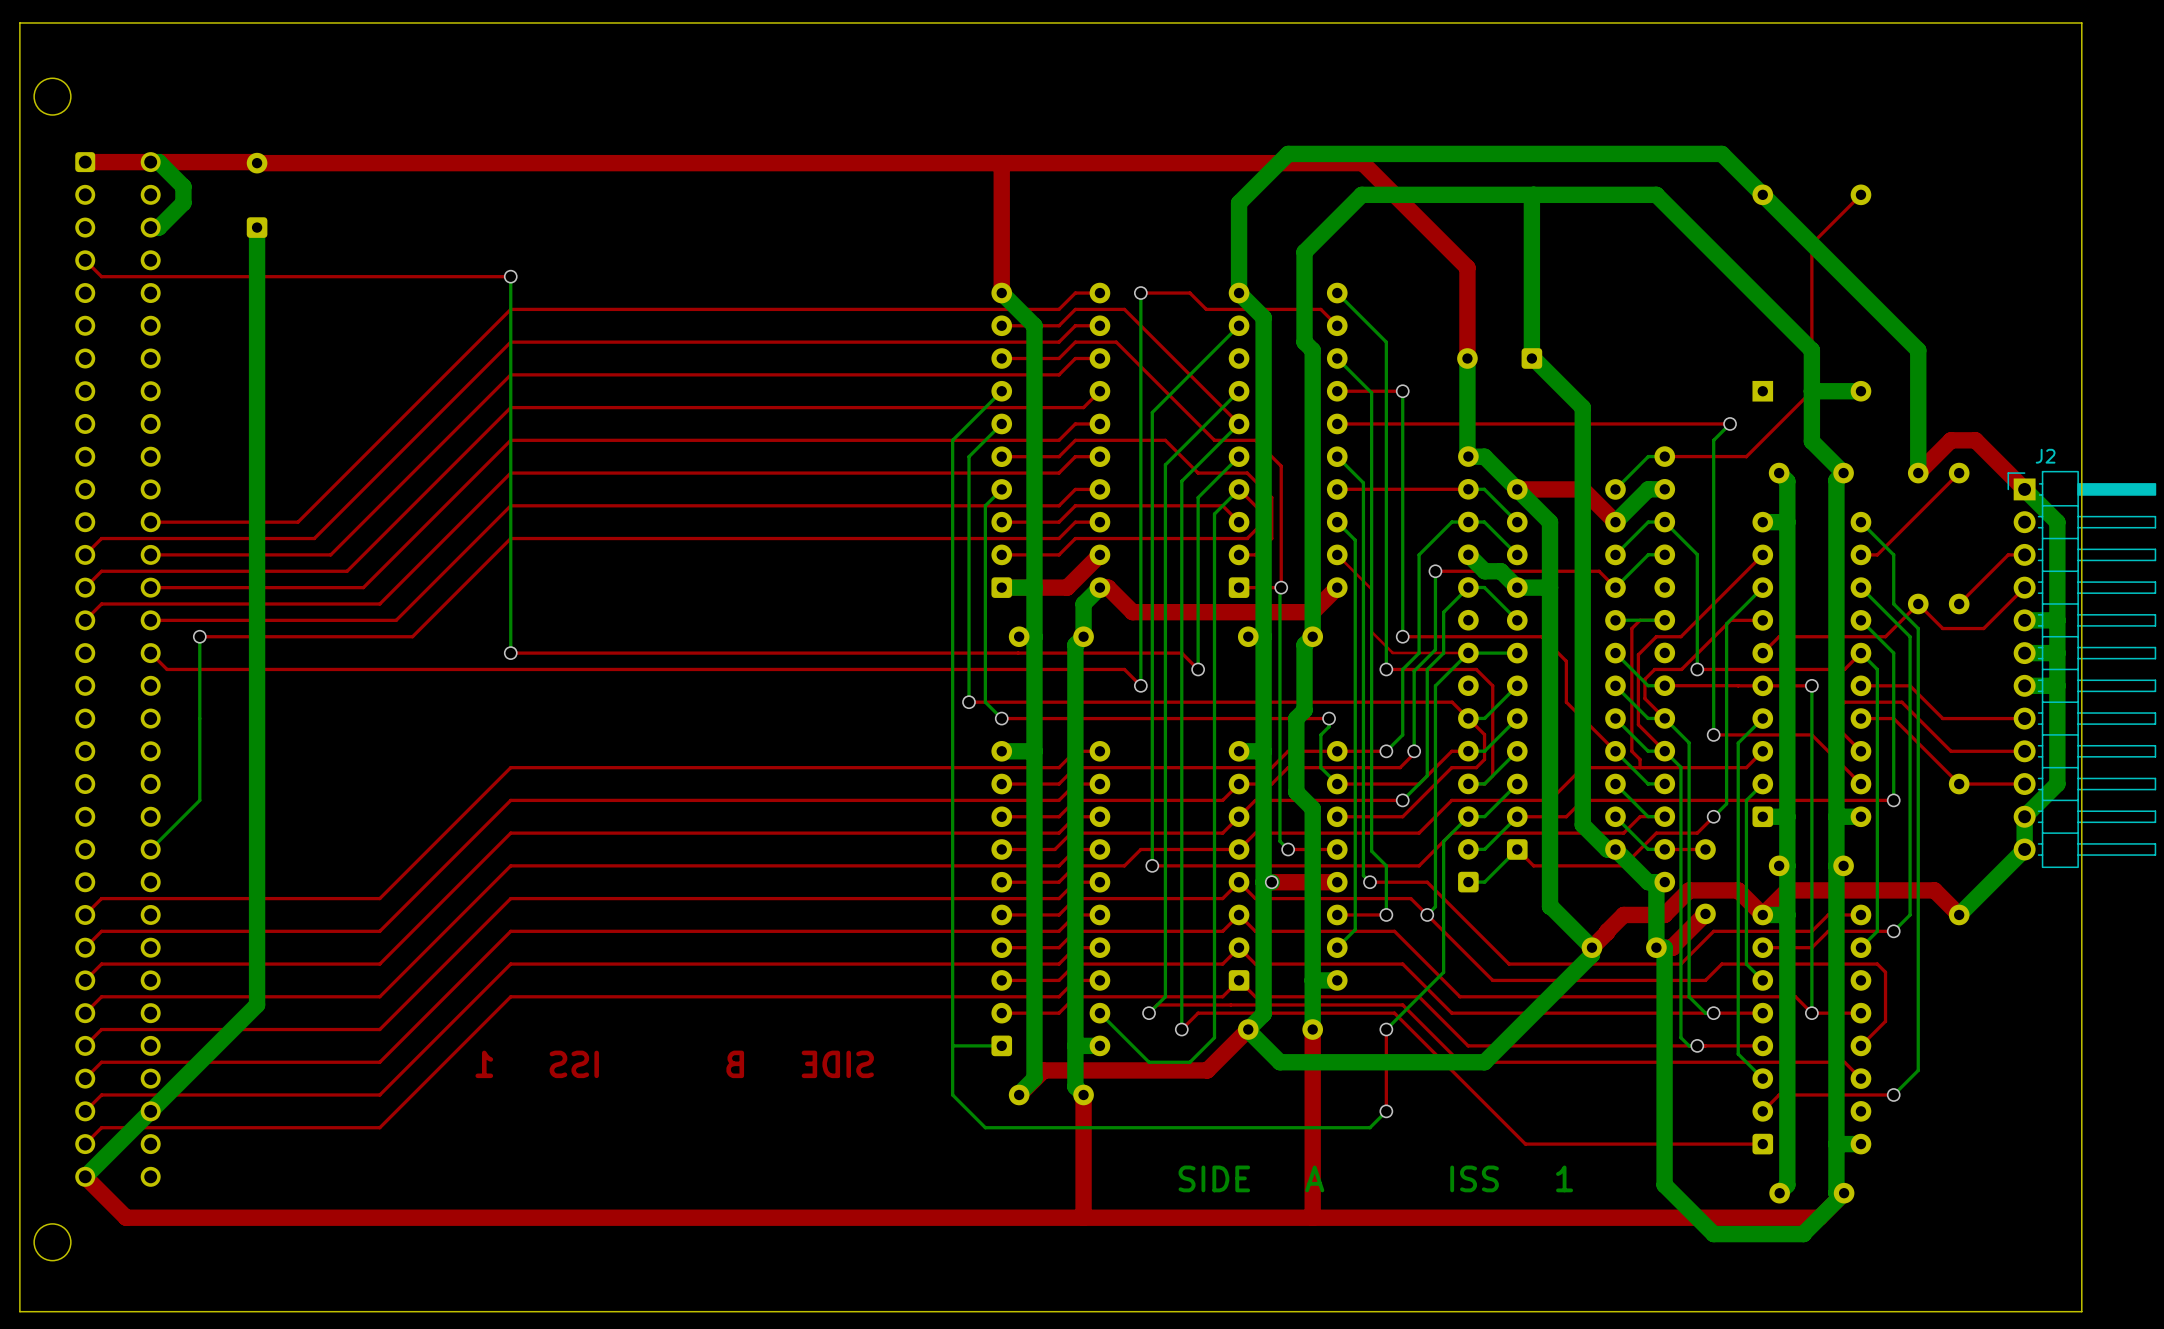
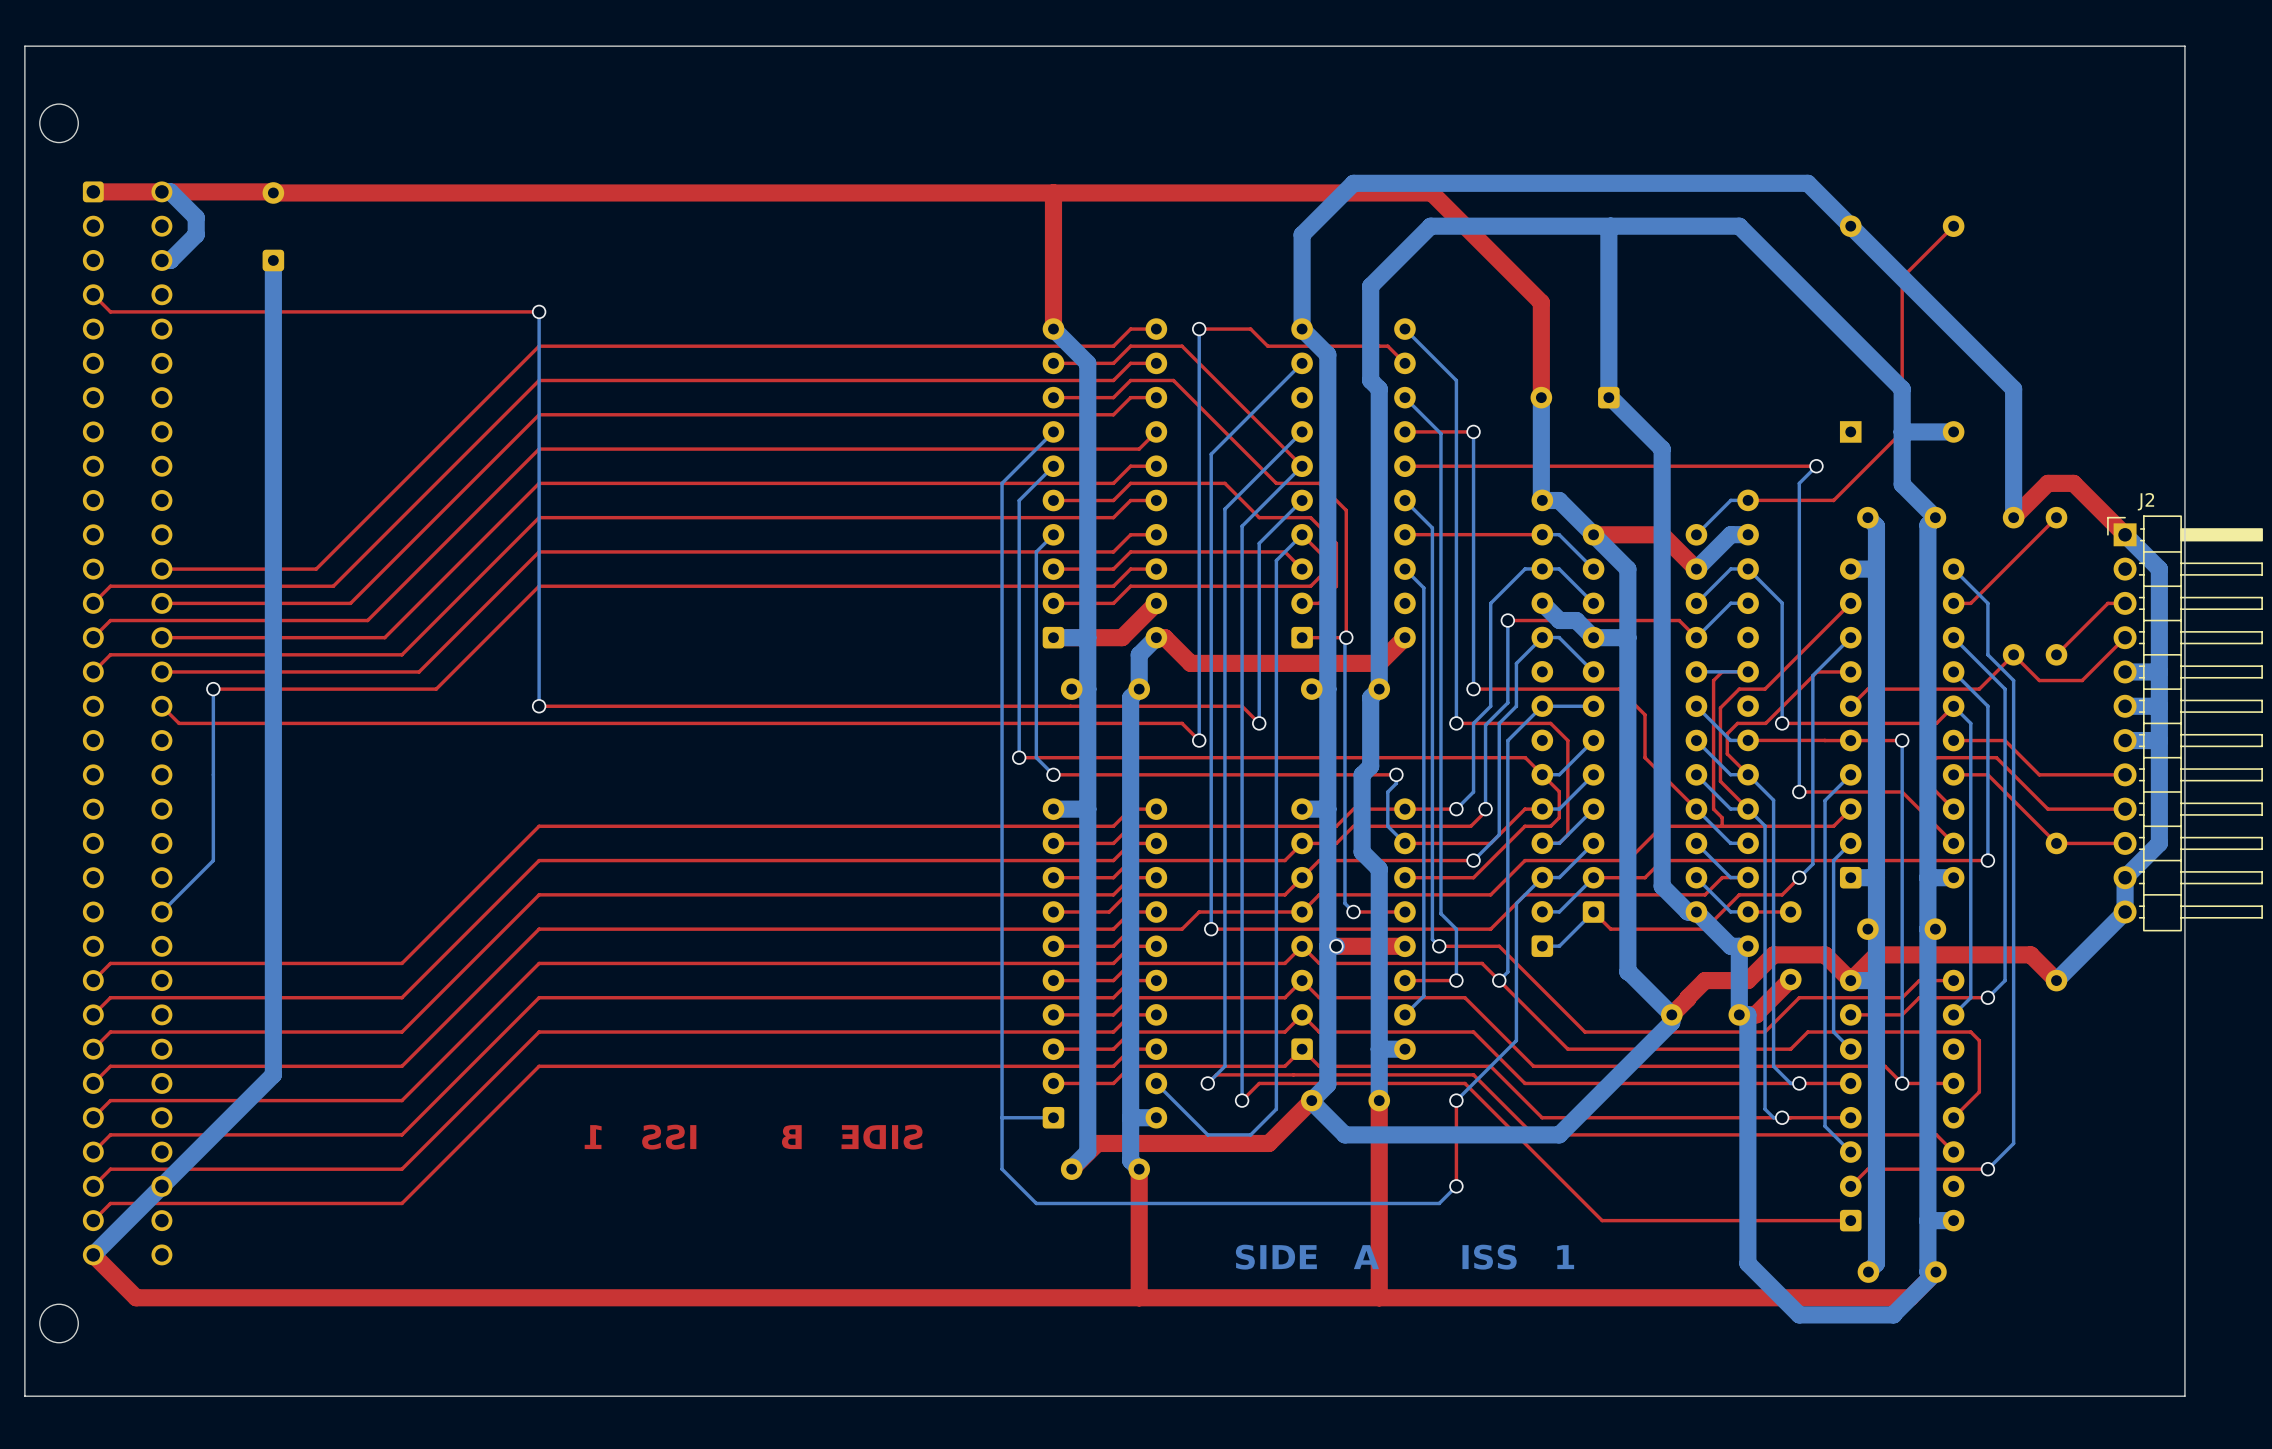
top track: (1337, 554) (1371, 589) (1371, 631) (1392, 652) (1468, 652) -> none

